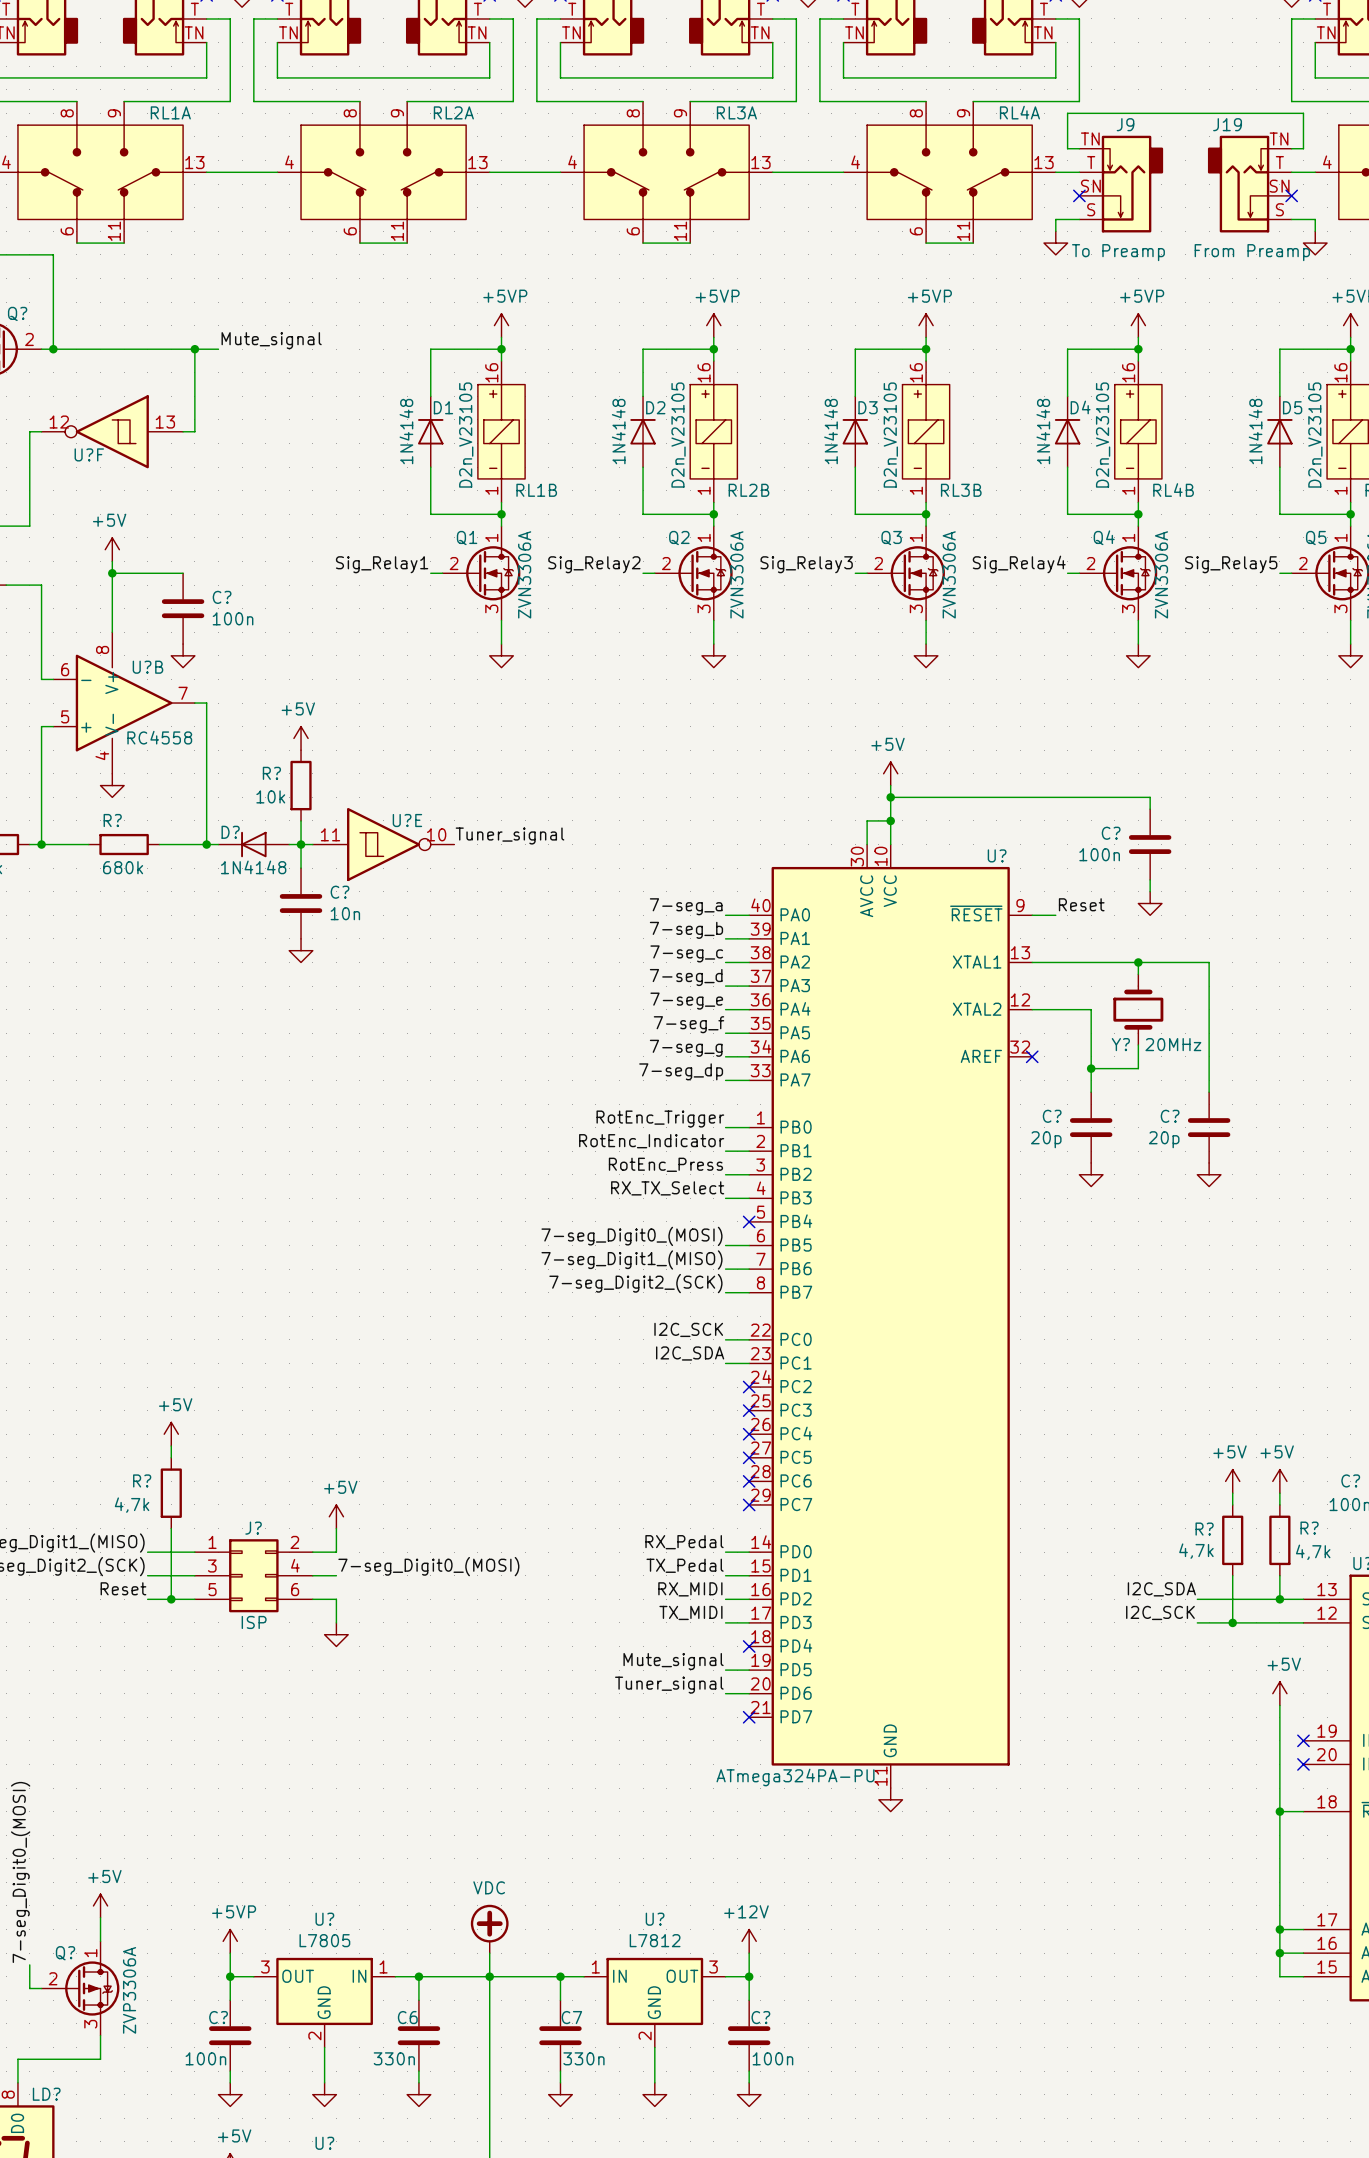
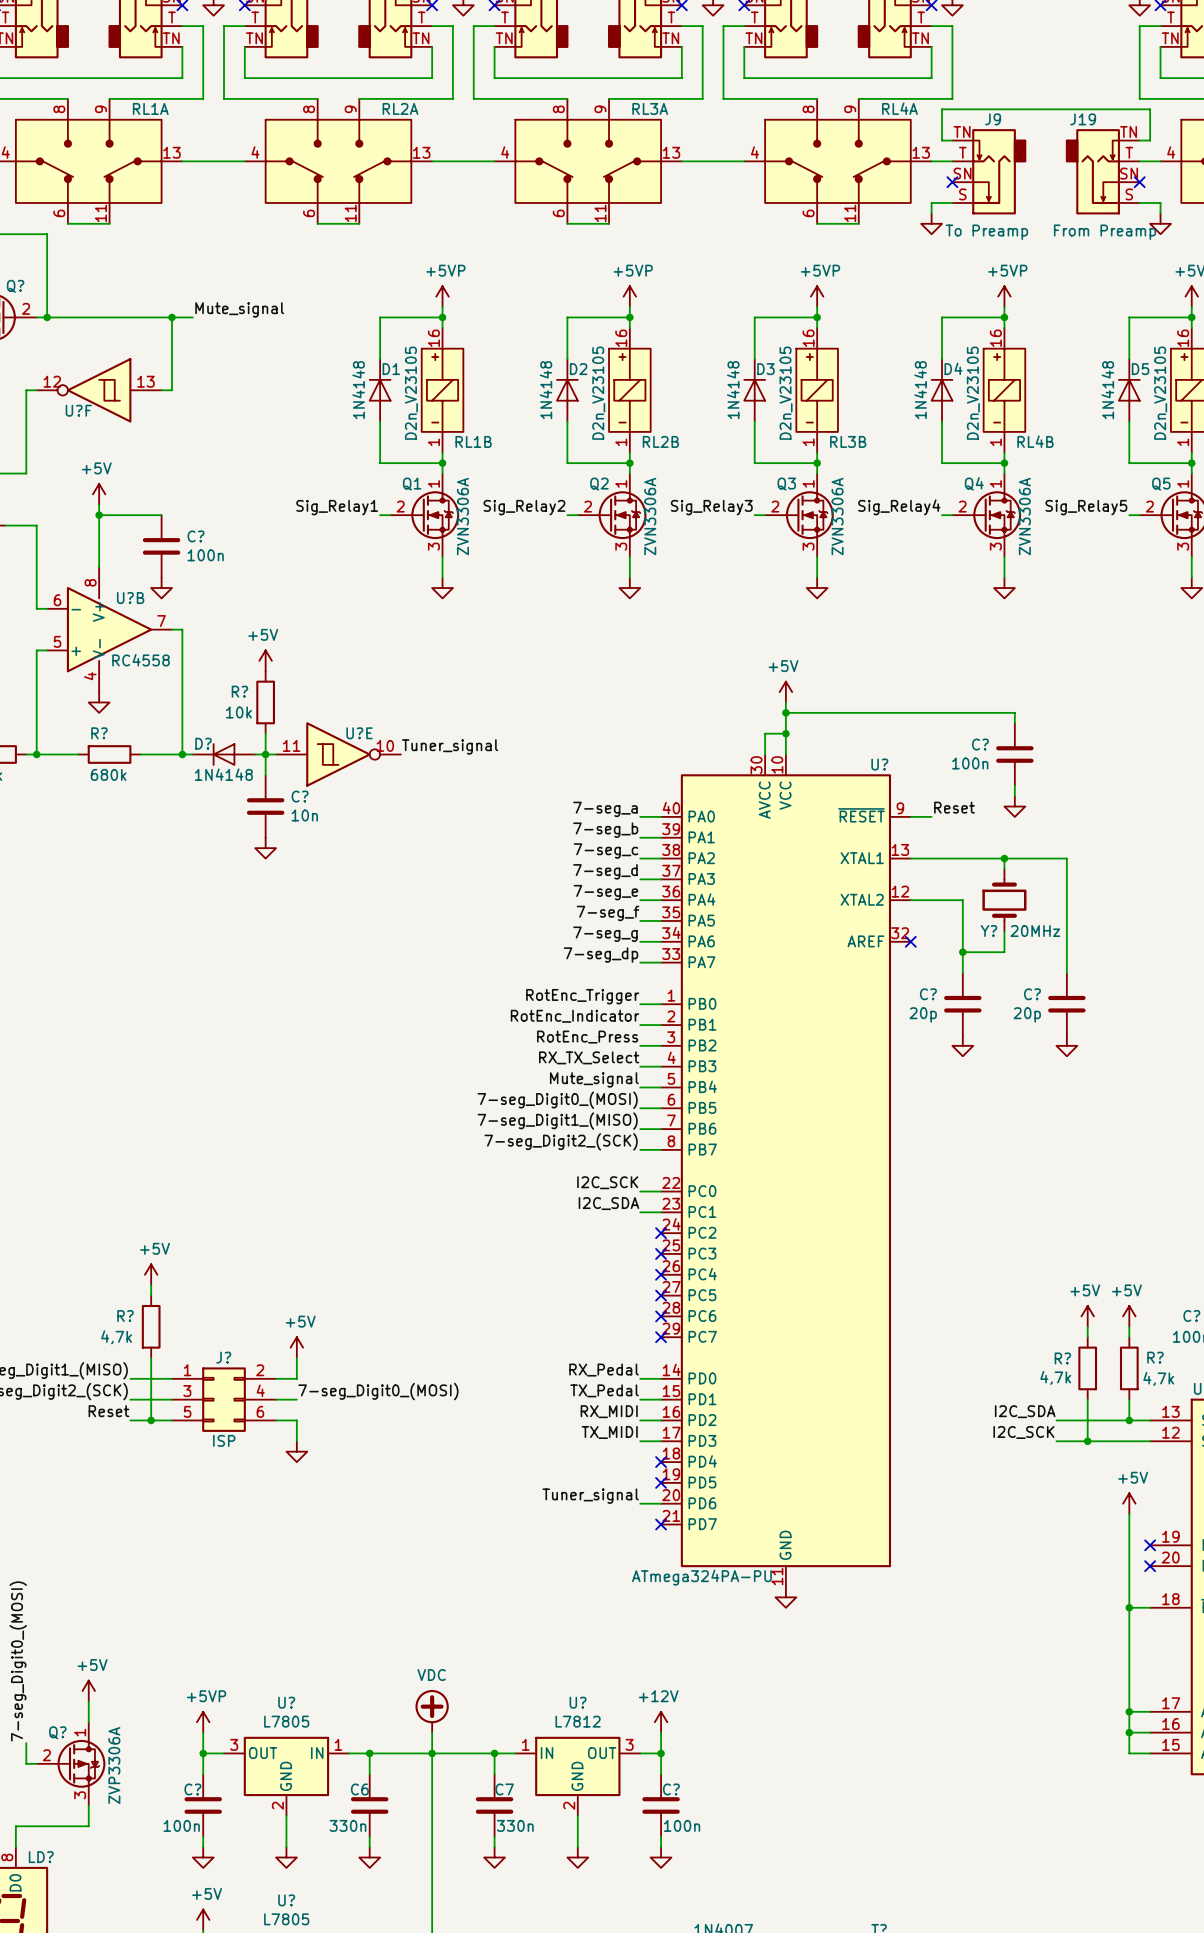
label: none -> Mute_signal (594, 1079)
wire: none -> (640, 1087) (661, 1087)
no-connect mark: (749, 1221) -> none
label: Mute_signal (673, 1661) -> none
wire: (725, 1670) (749, 1670) -> none
no-connect mark: none -> (661, 1482)

